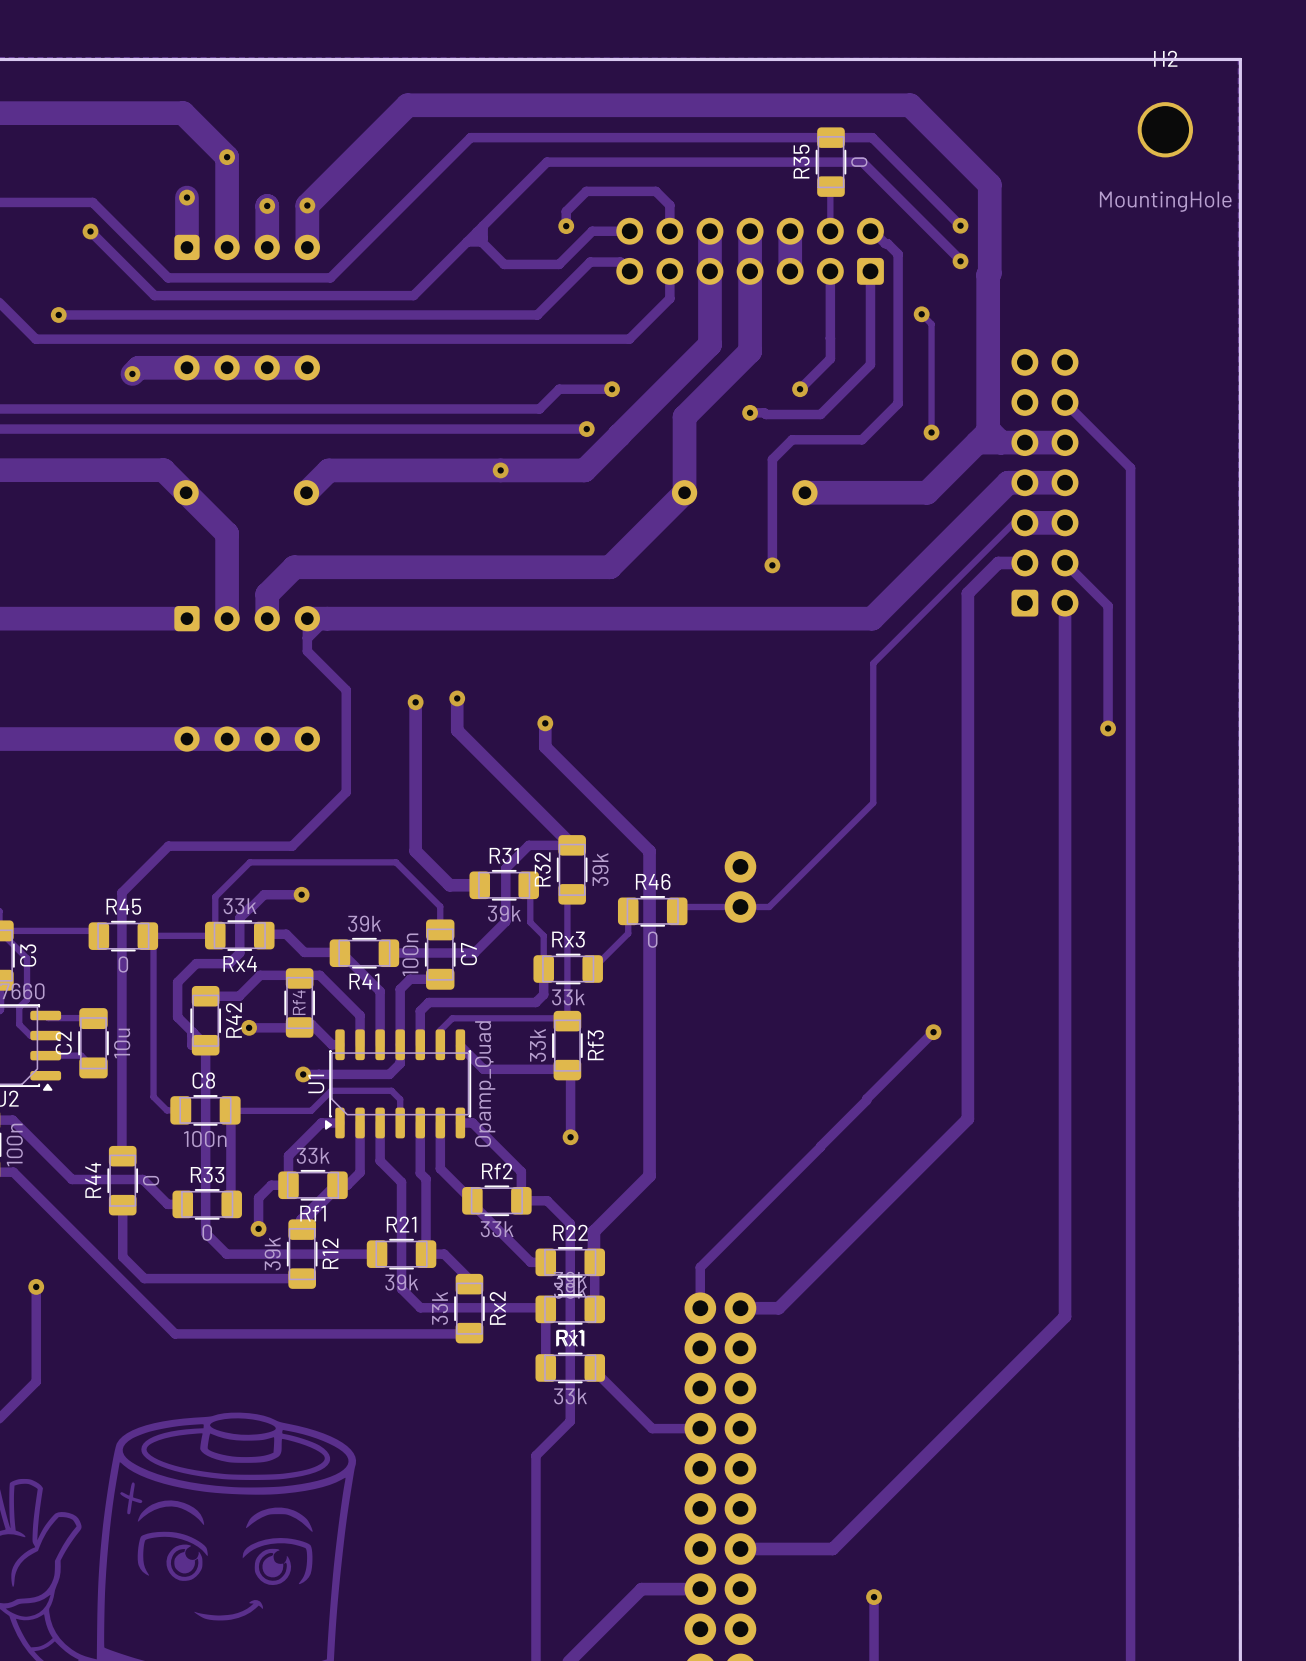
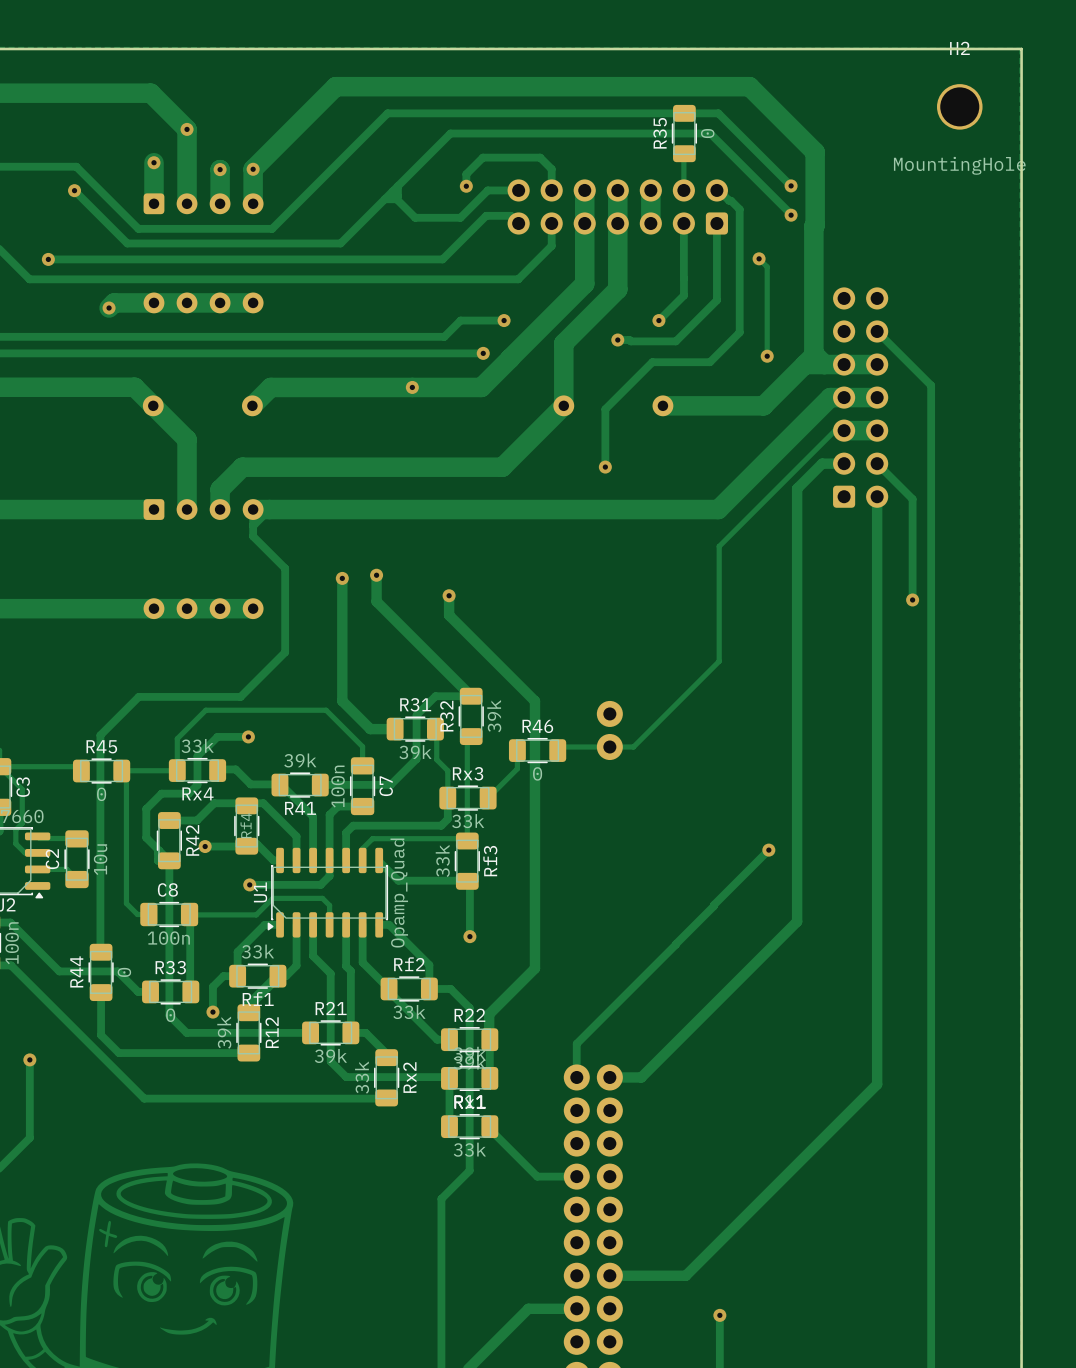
track: (772, 459) (772, 565) -> (636, 378) (605, 409) (605, 467)
via position: (772, 565) -> (605, 467)

